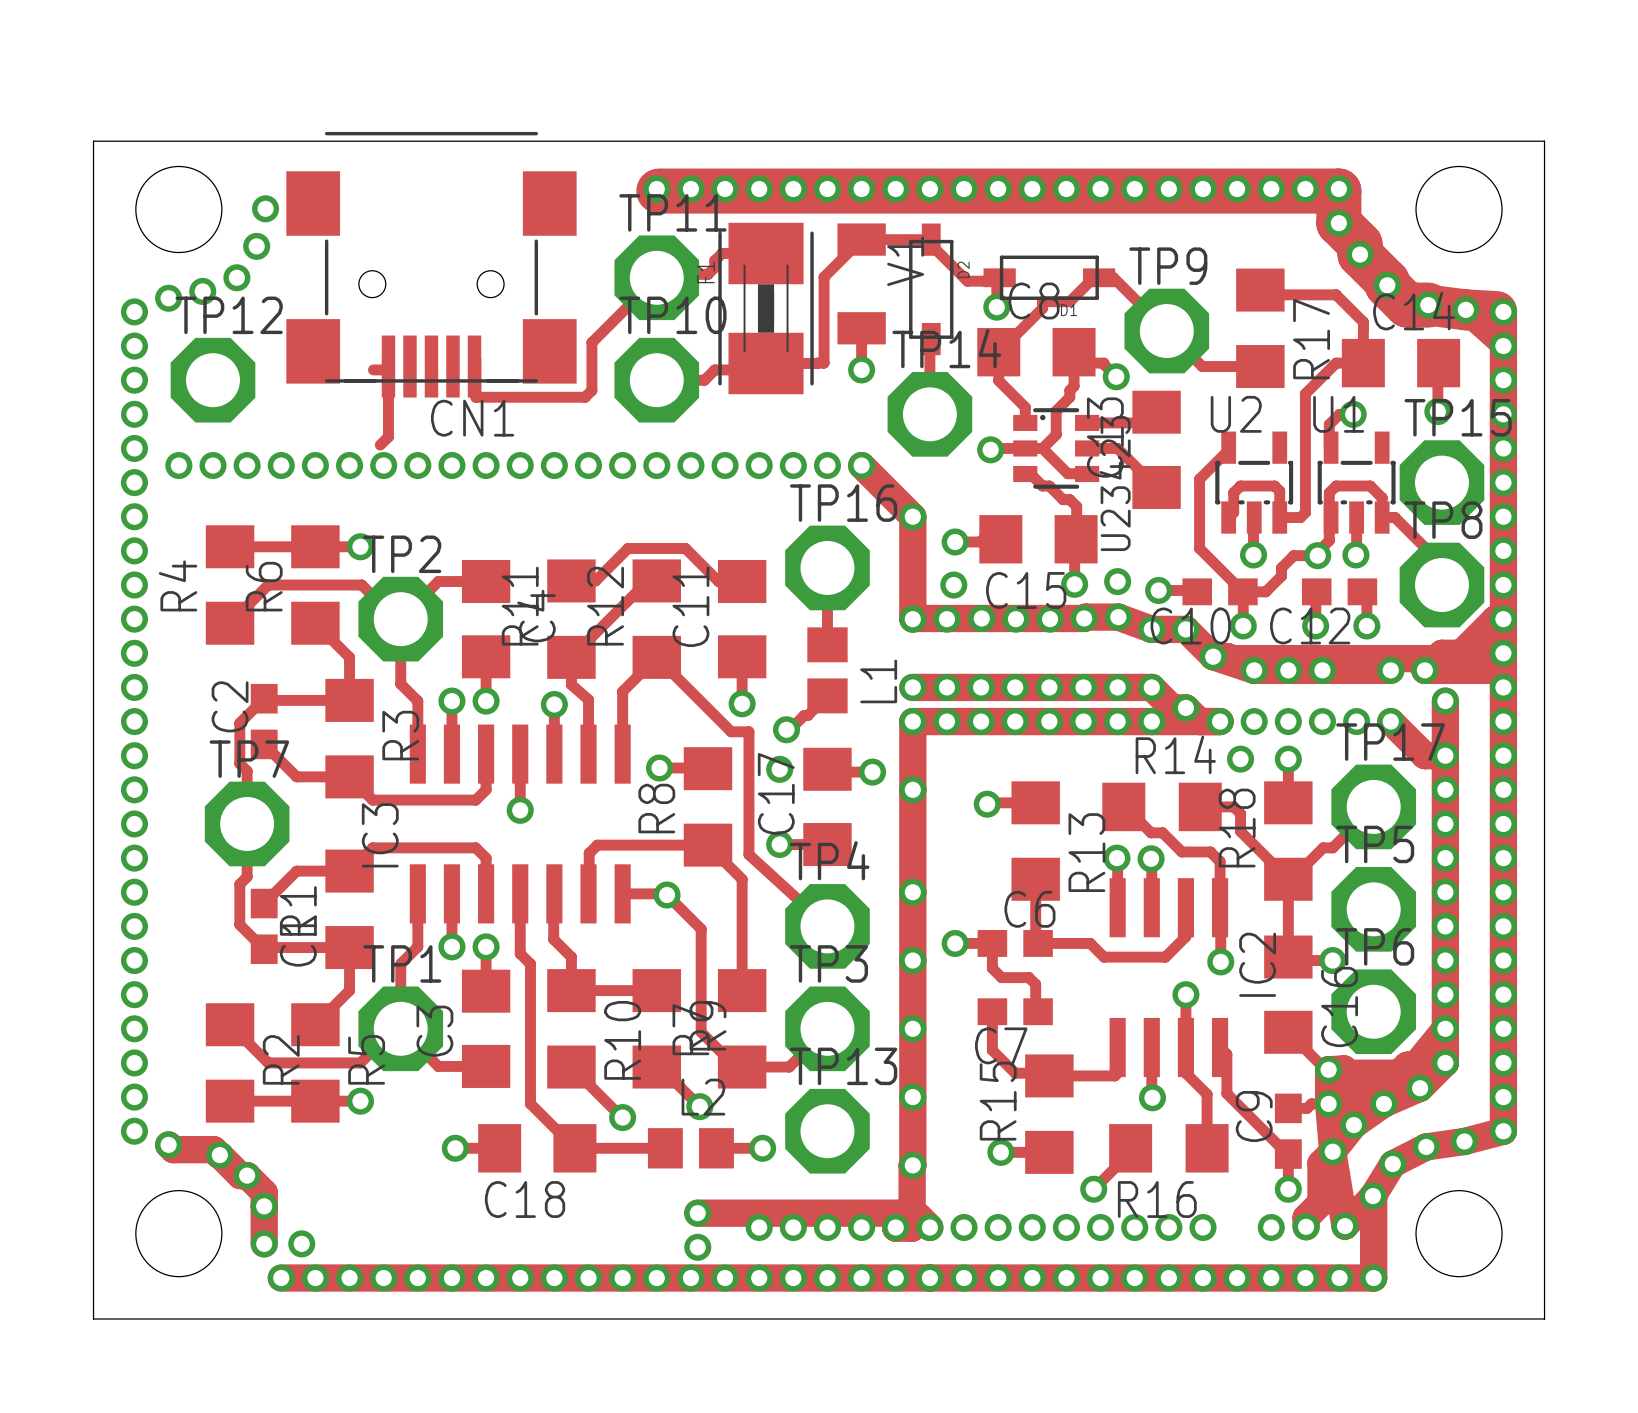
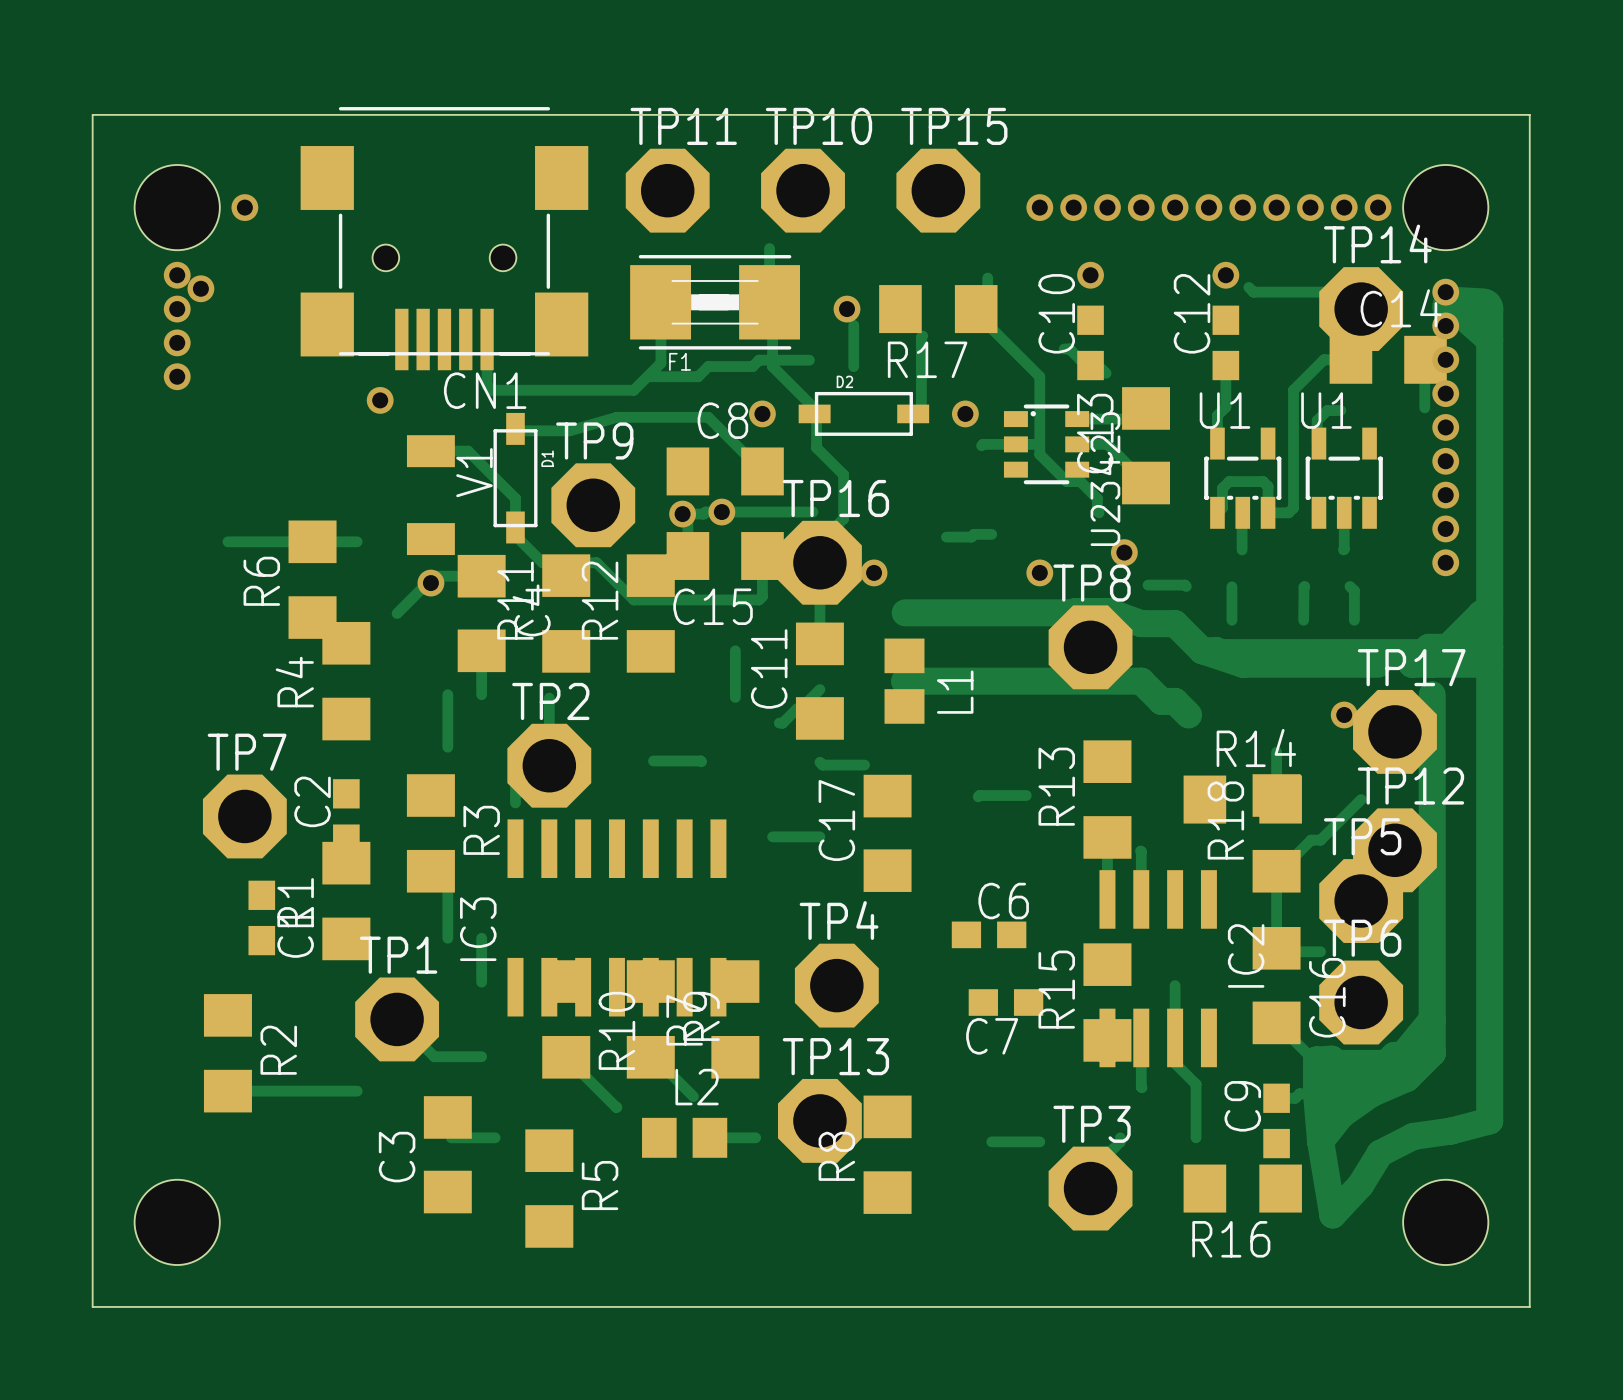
board edge: (93, 141) (1544, 141) (1543, 1318) -> (92, 139) (92, 114) (1529, 114) (1529, 1306)
via: (656, 189) -> none
via: (690, 189) -> none
via: (725, 189) -> none
via: (759, 189) -> none
via: (793, 189) -> none
via: (827, 189) -> none
via: (861, 189) -> none
via: (895, 189) -> none
via: (929, 189) -> none
via: (964, 189) -> none
via: (998, 189) -> none
via: (1032, 189) -> none
via: (1066, 189) -> none
via: (1100, 189) -> none
via: (1134, 189) -> none
via: (1168, 189) -> none
via: (1203, 189) -> none
via: (1237, 189) -> none
via: (1271, 189) -> none
via: (1305, 189) -> none
via: (1338, 189) -> none
track: (658, 191) (1338, 191) (1338, 223) (1360, 244) (1360, 254) (1407, 305) (1428, 305) (1465, 309) -> none
via position: (265, 208) -> (244, 207)
via: none -> (1039, 207)
via: none -> (1073, 207)
via: none -> (1107, 207)
via: none -> (1141, 207)
via: none -> (1175, 207)
via: none -> (1208, 207)
via: none -> (1242, 207)
via: none -> (1276, 207)
via: none -> (1310, 207)
via: none -> (1344, 207)
via: none -> (1378, 207)
via: (1338, 223) -> none
track: (861, 239) (824, 277) (824, 363) (817, 363) -> none
track: (861, 239) (931, 239) (931, 245) (967, 281) (996, 281) (999, 277) -> none
via: (256, 246) -> none
track: none -> (769, 248) (769, 302) (772, 305) (772, 366) (814, 408) (816, 415) (816, 447) (843, 474) (843, 518) (825, 537) (812, 537) (797, 552) (762, 552) (762, 596) (759, 599) (633, 599) (596, 562) (542, 562) (515, 535) (515, 498) (468, 451) (430, 451)
track: (766, 253) (722, 253) (714, 260) (714, 267) (707, 274) (660, 274) (591, 342) (591, 390) (585, 397) (475, 397) (475, 359) (474, 366) -> none
via: (1360, 254) -> none
CN1 position: (431, 264) -> (444, 238)
via: none -> (177, 275)
via: (236, 277) -> none
TP11 position: (656, 277) -> (667, 190)
D1 rotation: 0° (1049, 277) -> 90° clockwise (515, 478)
D1 position: (1049, 277) -> (515, 478)
via: none -> (1090, 275)
via: none -> (1225, 275)
V1 position: (861, 283) -> (430, 495)
via: (1387, 285) -> none
D2 rotation: 0° (931, 289) -> 90° clockwise (863, 413)
D2 position: (931, 289) -> (863, 413)
via: none -> (1445, 292)
via: (168, 298) -> none
track: none -> (660, 302) (660, 363) (633, 390) (491, 390) (487, 385) (487, 339)
via: (1428, 305) -> none
via: (996, 307) -> none
F1 rotation: 0° (766, 308) -> 90° counterclockwise (715, 302)
via: (1465, 309) -> none
via: (134, 311) -> none
via: none -> (177, 309)
via: none -> (846, 309)
track: none -> (976, 309) (976, 313) (1039, 376) (1039, 454) (1066, 481) (1080, 481) (1097, 498) (1097, 511) (1099, 512)
via: (1503, 311) -> none
R17 rotation: 0° (1260, 328) -> 90° clockwise (938, 309)
R17 position: (1260, 328) -> (938, 309)
via: none -> (1445, 325)
TP9 position: (1166, 331) -> (593, 505)
via: (134, 346) -> none
via: none -> (177, 342)
via: (1503, 346) -> none
C8 position: (1036, 352) -> (725, 471)
track: (1078, 356) (1074, 352) (1074, 386) (1069, 390) (1069, 397) (1056, 410) (1056, 434) (1042, 448) (1067, 473) (1086, 473) -> none
via: none -> (1445, 359)
track: (1260, 366) (1202, 366) (1113, 277) (1093, 277) (1069, 301) (1042, 301) (1042, 308) (998, 352) (998, 380) (1025, 407) (1025, 422) -> none
track: (373, 369) (385, 369) (388, 366) (388, 436) (380, 445) -> none
via: (861, 369) -> none
via: (1116, 376) -> none
via: (134, 380) -> none
via: none -> (177, 376)
TP12 position: (212, 380) -> (1394, 850)
TP10 position: (656, 380) -> (803, 190)
via: (1503, 380) -> none
via: none -> (1445, 393)
via: none -> (380, 400)
via: (1437, 411) -> none
via: (134, 414) -> none
TP14 position: (929, 414) -> (1361, 309)
U2 name: U2 (1236, 414) -> U1 (1224, 410)
via: (1353, 414) -> none
via: (1503, 414) -> none
via: none -> (762, 413)
via: none -> (1445, 427)
track: none -> (515, 428) (517, 430) (569, 430) (616, 417) (708, 417) (762, 471)
track: (1228, 447) (1228, 450) (1199, 479) (1199, 548) (1247, 595) -> (1217, 443) (1217, 415) (1225, 407) (1225, 365)
via: (134, 448) -> none
via: (1503, 448) -> none
via position: (990, 449) -> (965, 413)
via: (178, 465) -> none
via: (212, 465) -> none
via: (247, 465) -> none
via: (281, 465) -> none
via: (315, 465) -> none
via: (349, 465) -> none
via: (383, 465) -> none
via: (417, 465) -> none
via: (451, 465) -> none
via: (486, 465) -> none
via: (520, 465) -> none
via: (554, 465) -> none
via: (588, 465) -> none
via: (622, 465) -> none
via: (656, 465) -> none
via: (690, 465) -> none
via: (725, 465) -> none
via: (759, 465) -> none
via: (793, 465) -> none
via: (827, 465) -> none
track: (861, 465) (912, 516) (912, 619) -> none
via: (861, 465) -> none
via: none -> (1445, 461)
track: (1025, 474) (1030, 474) (1042, 486) (1049, 486) (1063, 499) (1069, 499) (1076, 506) (1074, 584) -> none
via: (134, 482) -> none
TP15 position: (1441, 482) -> (938, 190)
via: (1503, 482) -> none
via: none -> (1445, 495)
via: (134, 516) -> none
via: none -> (721, 512)
track: none -> (812, 512) (705, 512) (703, 514) (682, 514) (687, 519) (687, 556)
via: (912, 516) -> none
via: (1503, 516) -> none
via: none -> (682, 514)
via: none -> (1445, 528)
C15 position: (1038, 539) -> (725, 556)
via: (955, 542) -> none
via: (360, 546) -> none
via: (134, 550) -> none
via: (1503, 550) -> none
via: (1253, 554) -> none
via: (1355, 554) -> none
via: (1317, 555) -> none
via: none -> (1124, 552)
via: none -> (1445, 562)
via: none -> (874, 572)
track: (571, 580) (595, 580) (628, 548) (685, 548) (718, 581) (742, 581) -> none
track: (656, 580) (647, 580) (571, 657) (571, 684) (588, 699) (588, 754) -> none
via: (1117, 581) -> none
via position: (1074, 584) -> (1039, 572)
via: (134, 585) -> none
R4 position: (230, 585) -> (346, 681)
via: (953, 585) -> none
TP8 position: (1441, 585) -> (1090, 647)
via: (1503, 585) -> none
via: none -> (430, 583)
track: (1445, 588) (1441, 585) (1441, 564) (1394, 517) (1382, 517) (1382, 497) (1370, 486) (1336, 486) (1329, 492) (1329, 517) (1331, 517) (1329, 519) (1329, 540) (1317, 552) (1317, 555) (1293, 555) (1281, 567) (1281, 576) (1265, 591) (1242, 591) -> none
via: (1158, 590) -> none
C10 rotation: 0° (1220, 591) -> 90° clockwise (1090, 342)
C10 position: (1220, 591) -> (1090, 342)
C12 rotation: 0° (1339, 591) -> 90° clockwise (1225, 342)
C12 position: (1339, 591) -> (1225, 342)
via: (1118, 617) -> none
via: (981, 618) -> none
via: (1084, 618) -> none
via: (134, 619) -> none
TP2 position: (400, 619) -> (549, 765)
C11 position: (742, 619) -> (819, 681)
via: (912, 619) -> none
via: (946, 619) -> none
via: (1015, 619) -> none
via: (1050, 619) -> none
via: (1503, 619) -> none
track: (230, 623) (268, 585) (361, 585) (395, 619) (400, 619) (400, 684) (417, 701) (417, 754) -> none
track: (315, 623) (349, 657) (349, 700) (265, 700) (264, 698) (239, 723) (239, 763) (247, 771) (247, 876) (239, 884) (239, 924) (264, 949) (265, 947) (349, 947) (349, 990) (315, 1024) -> none
via: (1243, 625) -> none
via: (1315, 625) -> none
via: (1366, 625) -> none
via: (1151, 629) -> none
via: (1185, 629) -> none
via: (134, 653) -> none
via: (1503, 653) -> none
via: (1213, 656) -> none
L1 position: (827, 670) -> (904, 681)
via: (1254, 670) -> none
via: (1288, 670) -> none
via: (1322, 670) -> none
via: (1390, 670) -> none
via: (1424, 670) -> none
via: (134, 687) -> none
via: (912, 687) -> none
via: (946, 687) -> none
via: (981, 687) -> none
via: (1015, 687) -> none
via: (1049, 687) -> none
via: (1083, 687) -> none
via: (1117, 687) -> none
via: (1151, 687) -> none
via: (1503, 687) -> none
via: (451, 701) -> none
via: (486, 701) -> none
via: (1445, 701) -> none
via: (742, 703) -> none
via: (554, 704) -> none
via: (1185, 707) -> none
via: (134, 721) -> none
C2 position: (264, 721) -> (346, 816)
via: (912, 721) -> none
via: (946, 721) -> none
via: (981, 721) -> none
via: (1015, 721) -> none
via: (1049, 721) -> none
via: (1083, 721) -> none
via: (1117, 721) -> none
via: (1151, 721) -> none
track: (1220, 721) (912, 721) (912, 1228) (895, 1227) -> none
via: (1220, 721) -> none
via: (1254, 721) -> none
via: (1288, 721) -> none
via: (1322, 721) -> none
track: (1390, 721) (1424, 755) (1445, 755) -> none
via: (1390, 721) -> none
via: (1503, 721) -> none
via: (786, 729) -> none
R3 position: (349, 738) -> (430, 833)
track: (264, 744) (296, 776) (349, 776) (372, 800) (475, 800) (486, 789) (486, 754) -> none
track: (622, 754) (622, 691) (656, 657) (731, 731) (748, 731) (748, 854) (827, 926) -> none
via: (134, 755) -> none
via: (1445, 755) -> none
via: (1503, 755) -> none
via: (1240, 759) -> none
via: (1288, 759) -> none
via: (659, 768) -> none
via: (779, 769) -> none
via: (872, 772) -> none
via: (134, 789) -> none
via: (912, 789) -> none
via: (1445, 789) -> none
via: (1503, 789) -> none
via: (987, 804) -> none
R8 position: (707, 806) -> (887, 1154)
C17 position: (827, 806) -> (887, 833)
track: (1123, 806) (1151, 832) (1162, 832) (1181, 851) (1210, 851) (1220, 861) (1220, 961) -> none
R14 position: (1162, 806) -> (1242, 799)
track: (1200, 806) (1233, 806) (1240, 813) (1240, 831) (1288, 879) -> none
TP17 position: (1373, 806) -> (1394, 731)
via: (520, 810) -> none
via: (134, 823) -> none
IC3 position: (520, 823) -> (616, 917)
via: (1445, 823) -> none
via: (1503, 823) -> none
R13 position: (1035, 841) -> (1107, 799)
via: (779, 844) -> none
R13 name position: R13 (1086, 852) -> R13 (1056, 786)
via: (134, 858) -> none
via: (1116, 858) -> none
via: (1151, 858) -> none
via: (1445, 858) -> none
via: (1503, 858) -> none
track: (1035, 879) (1035, 943) (1090, 943) (1104, 957) (1165, 957) (1185, 936) (1185, 907) -> none
via: (134, 892) -> none
via: (912, 892) -> none
via: (1445, 892) -> none
via: (1503, 892) -> none
track: (417, 893) (417, 946) (400, 963) (400, 1028) (394, 1028) (360, 1062) (268, 1062) (230, 1024) -> none
track: (486, 893) (486, 858) (475, 847) (372, 847) (349, 871) (296, 871) (264, 903) -> none
track: (520, 893) (520, 953) (530, 963) (530, 1103) (574, 1148) (665, 1148) -> none
track: (554, 893) (553, 939) (571, 957) (571, 990) (656, 990) -> none
track: (622, 893) (665, 893) (701, 929) (701, 1032) (735, 1067) (789, 1067) (827, 1028) -> none
via: (667, 894) -> none
track: (588, 913) (589, 853) (597, 845) (707, 845) (742, 879) (742, 990) -> none
via: (134, 926) -> none
TP4 position: (827, 926) -> (836, 985)
via: (1445, 926) -> none
via: (1503, 926) -> none
track: (955, 943) (992, 943) (992, 968) (1001, 977) (1028, 977) (1035, 984) (1035, 1009) (1038, 1011) -> none
via: (955, 943) -> none
C6 position: (1015, 943) -> (989, 934)
via: (451, 946) -> none
via: (486, 946) -> none
via: (134, 960) -> none
via: (912, 960) -> none
via: (1332, 960) -> none
via: (1445, 960) -> none
via: (1503, 960) -> none
via: (1220, 961) -> none
via: (134, 994) -> none
via: (1185, 994) -> none
via: (1445, 994) -> none
via: (1503, 994) -> none
track: (992, 1011) (992, 1050) (1015, 1073) (1046, 1073) (1049, 1075) (1114, 1075) (1117, 1073) (1117, 1047) -> none
via: (134, 1028) -> none
C3 position: (486, 1028) -> (447, 1154)
TP3 position: (827, 1028) -> (1090, 1188)
via: (912, 1028) -> none
via: (1445, 1028) -> none
via: (1503, 1028) -> none
track: (1220, 1047) (1226, 1054) (1226, 1093) (1288, 1154) (1288, 1189) -> none
via: (134, 1062) -> none
R5 position: (315, 1062) -> (549, 1188)
via: (1445, 1062) -> none
via: (1503, 1062) -> none
via: (1328, 1069) -> none
via: (1420, 1088) -> none
via: (134, 1097) -> none
via: (912, 1097) -> none
via: (1152, 1097) -> none
via: (1503, 1097) -> none
via: (360, 1101) -> none
via: (1328, 1103) -> none
via: (1383, 1103) -> none
via: (699, 1106) -> none
R15 position: (1049, 1114) -> (1107, 1002)
via: (622, 1117) -> none
via: (1353, 1125) -> none
via: (134, 1131) -> none
via: (1503, 1131) -> none
via: (1464, 1141) -> none
track: (168, 1144) (173, 1149) (213, 1149) (240, 1175) (247, 1175) (264, 1192) (264, 1243) -> none
via: (168, 1144) -> none
via: (1426, 1146) -> none
via: (455, 1148) -> none
C18: (537, 1148) -> none
via: (762, 1148) -> none
R16 position: (1168, 1148) -> (1242, 1188)
track: (1332, 1151) (1320, 1163) (1320, 1202) (1306, 1217) (1306, 1226) -> none
via: (1332, 1151) -> none
via: (1000, 1152) -> none
via: (219, 1155) -> none
via: (1392, 1164) -> none
via: (912, 1165) -> none
via: (247, 1175) -> none
via: (1093, 1189) -> none
via: (1288, 1189) -> none
track: (1373, 1196) (1373, 1278) (281, 1278) -> none
via: (1373, 1196) -> none
via: (264, 1206) -> none
track: (697, 1213) (909, 1213) (912, 1216) (918, 1216) (929, 1227) -> none
via: (697, 1213) -> none
via: (1306, 1226) -> none
via: (1345, 1226) -> none
via: (759, 1227) -> none
via: (793, 1227) -> none
via: (827, 1227) -> none
via: (861, 1227) -> none
via: (895, 1227) -> none
via: (929, 1227) -> none
via: (964, 1227) -> none
via: (998, 1227) -> none
via: (1032, 1227) -> none
via: (1066, 1227) -> none
via: (1100, 1227) -> none
via: (1134, 1227) -> none
via: (1168, 1227) -> none
via: (1203, 1227) -> none
via: (1271, 1227) -> none
via: (264, 1243) -> none
via: (301, 1243) -> none
via: (697, 1247) -> none
via: (281, 1278) -> none
via: (315, 1278) -> none
via: (349, 1278) -> none
via: (383, 1278) -> none
via: (417, 1278) -> none
via: (451, 1278) -> none
via: (486, 1278) -> none
via: (520, 1278) -> none
via: (554, 1278) -> none
via: (588, 1278) -> none
via: (622, 1278) -> none
via: (656, 1278) -> none
via: (690, 1278) -> none
via: (725, 1278) -> none
via: (759, 1278) -> none
via: (793, 1278) -> none
via: (827, 1278) -> none
via: (861, 1278) -> none
via: (895, 1278) -> none
via: (929, 1278) -> none
via: (964, 1278) -> none
via: (998, 1278) -> none
via: (1032, 1278) -> none
via: (1066, 1278) -> none
via: (1100, 1278) -> none
via: (1134, 1278) -> none
via: (1168, 1278) -> none
via: (1203, 1278) -> none
via: (1237, 1278) -> none
via: (1271, 1278) -> none
via: (1305, 1278) -> none
via: (1339, 1278) -> none
via: (1373, 1278) -> none

